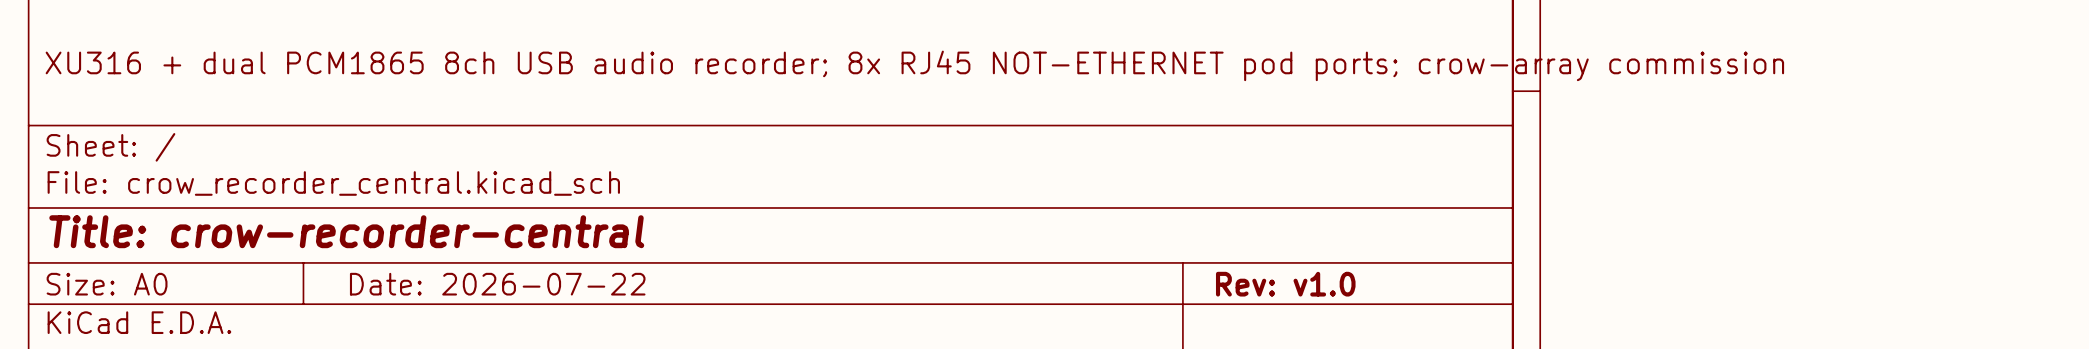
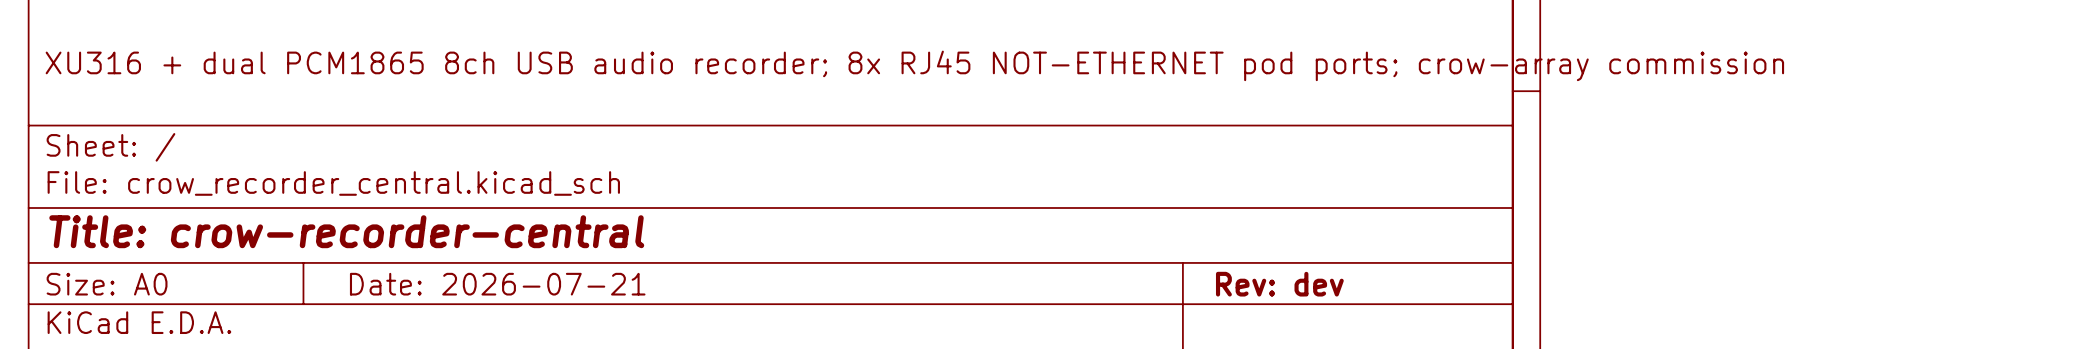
title block: Date: 2026-07-22 (497, 284) -> Date: 2026-07-21 (497, 284)
title block: Rev: v1.0 (1285, 284) -> Rev: dev (1279, 284)

